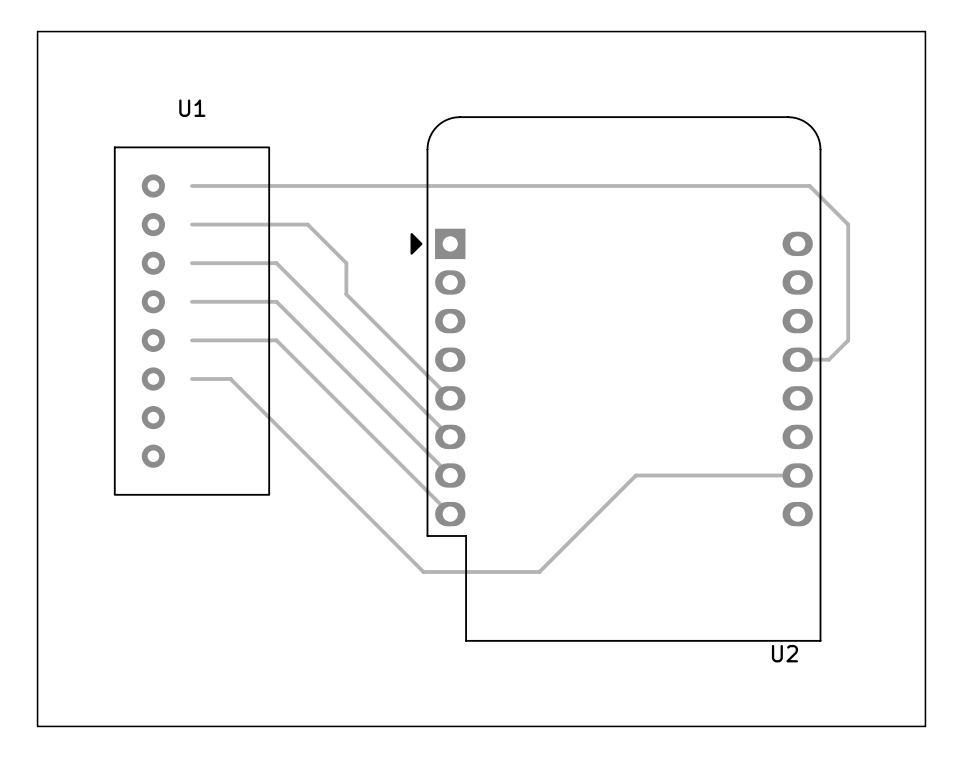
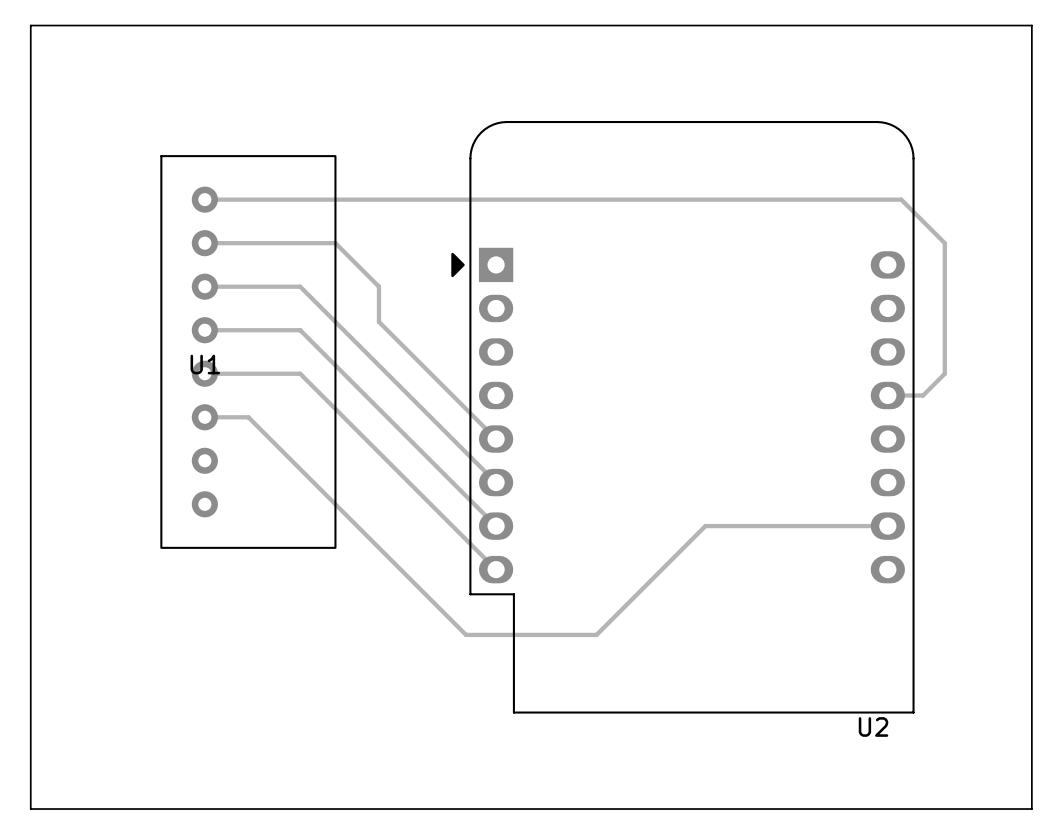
U1 name position: U1 (192, 108) -> U1 (205, 364)
U1 position: (191, 321) -> (248, 351)

